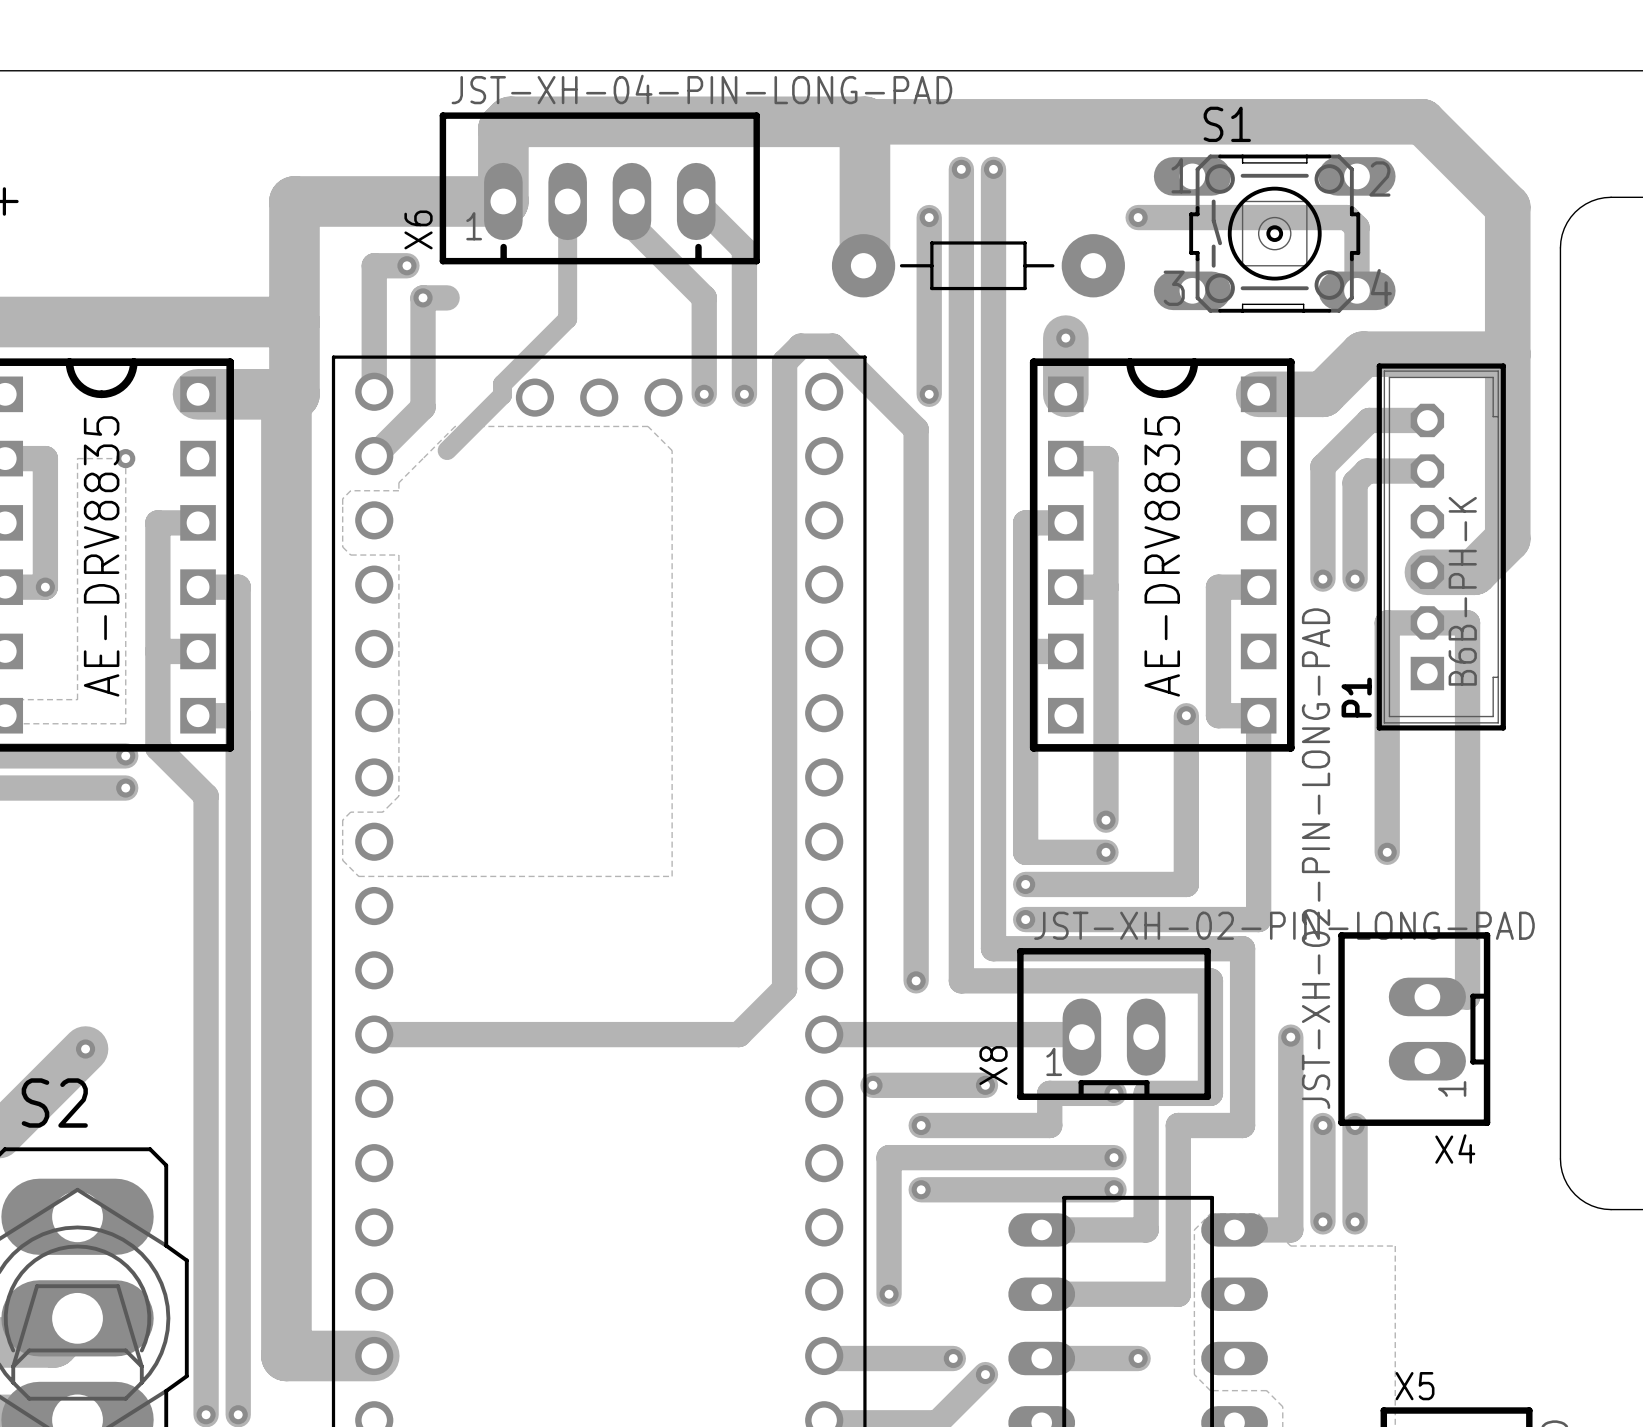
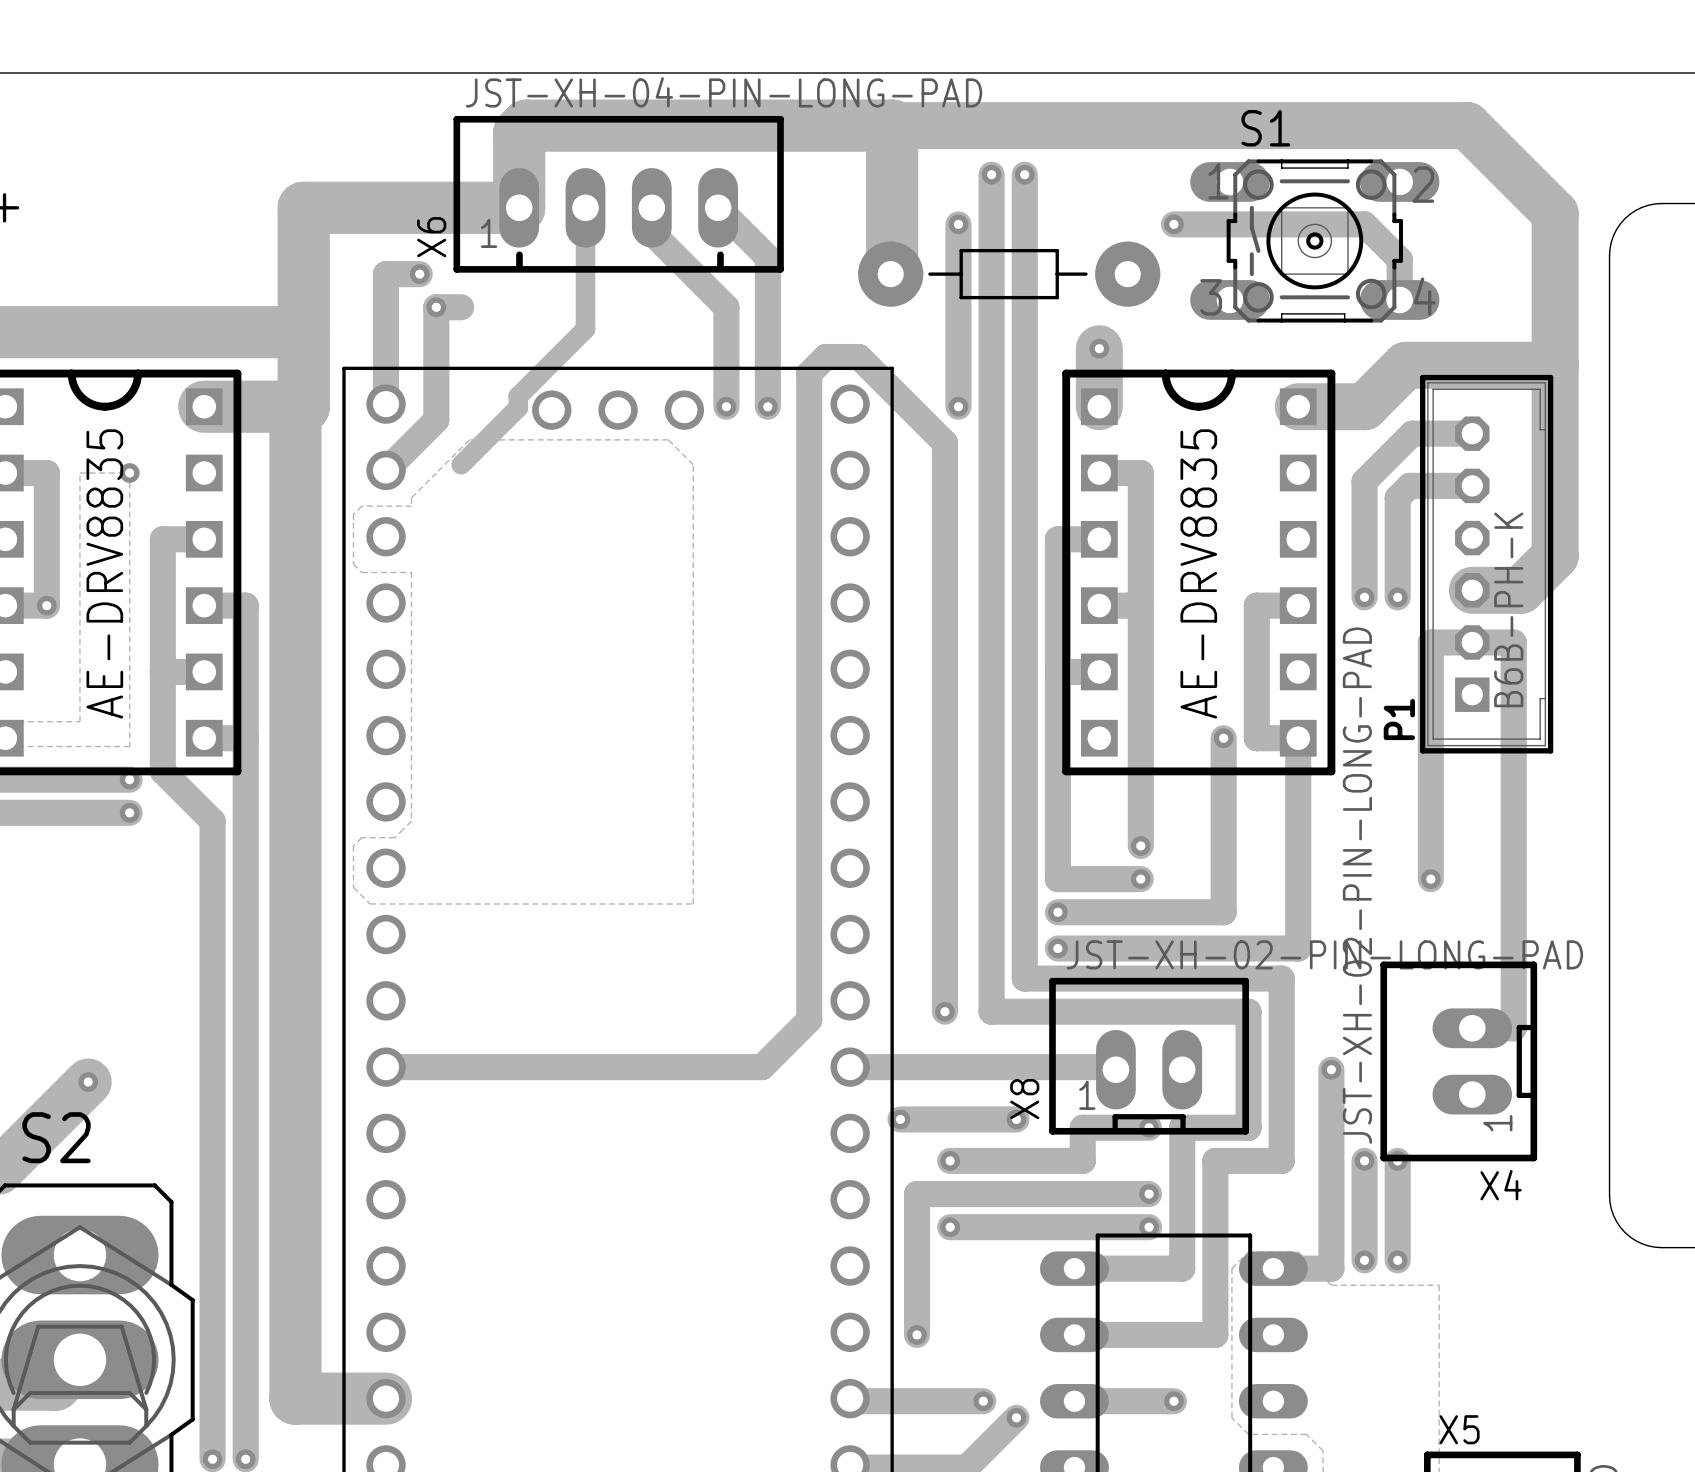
track: (1322, 217) (1347, 217) (1357, 227) (1357, 251) -> (1364, 224) (1399, 259)

